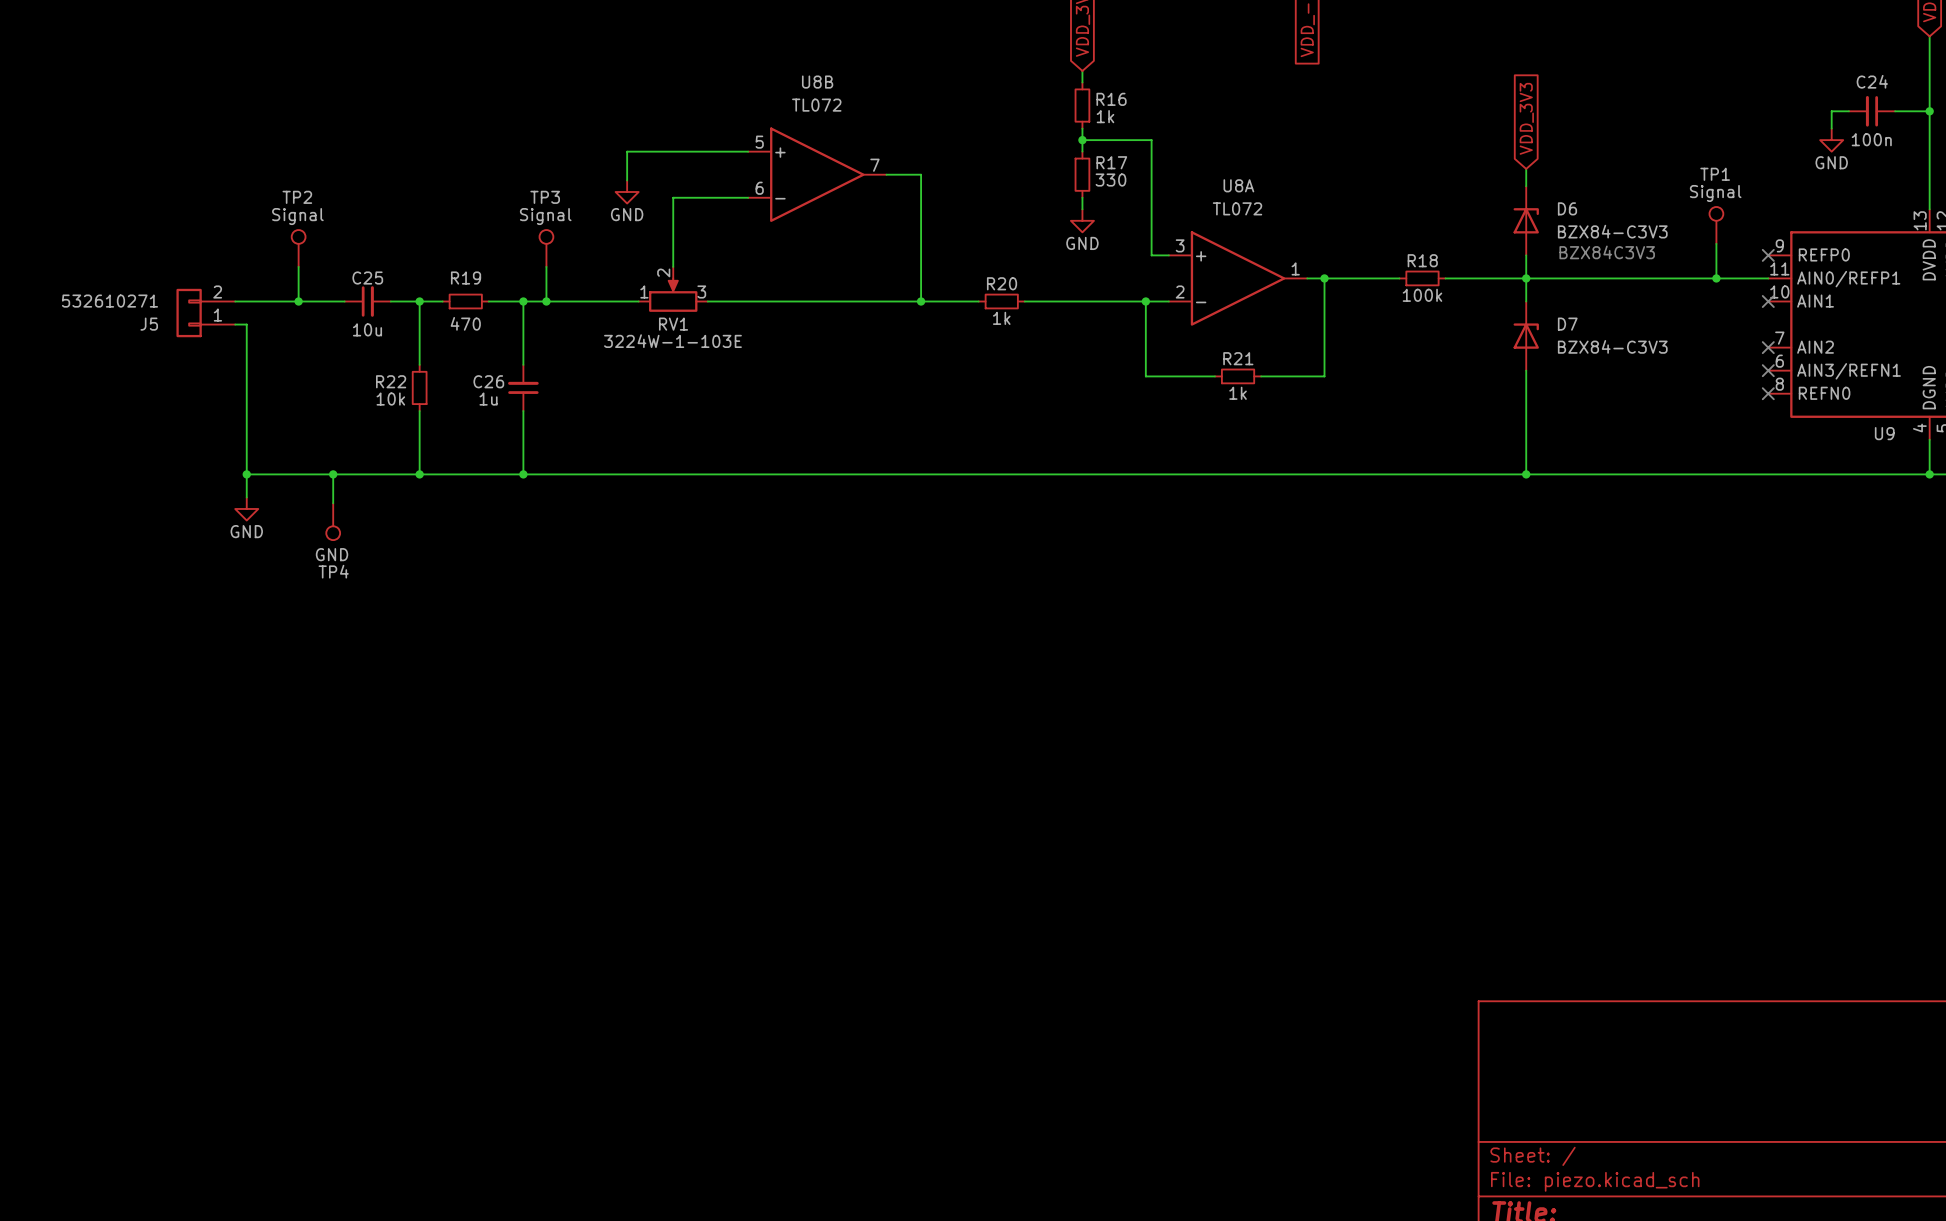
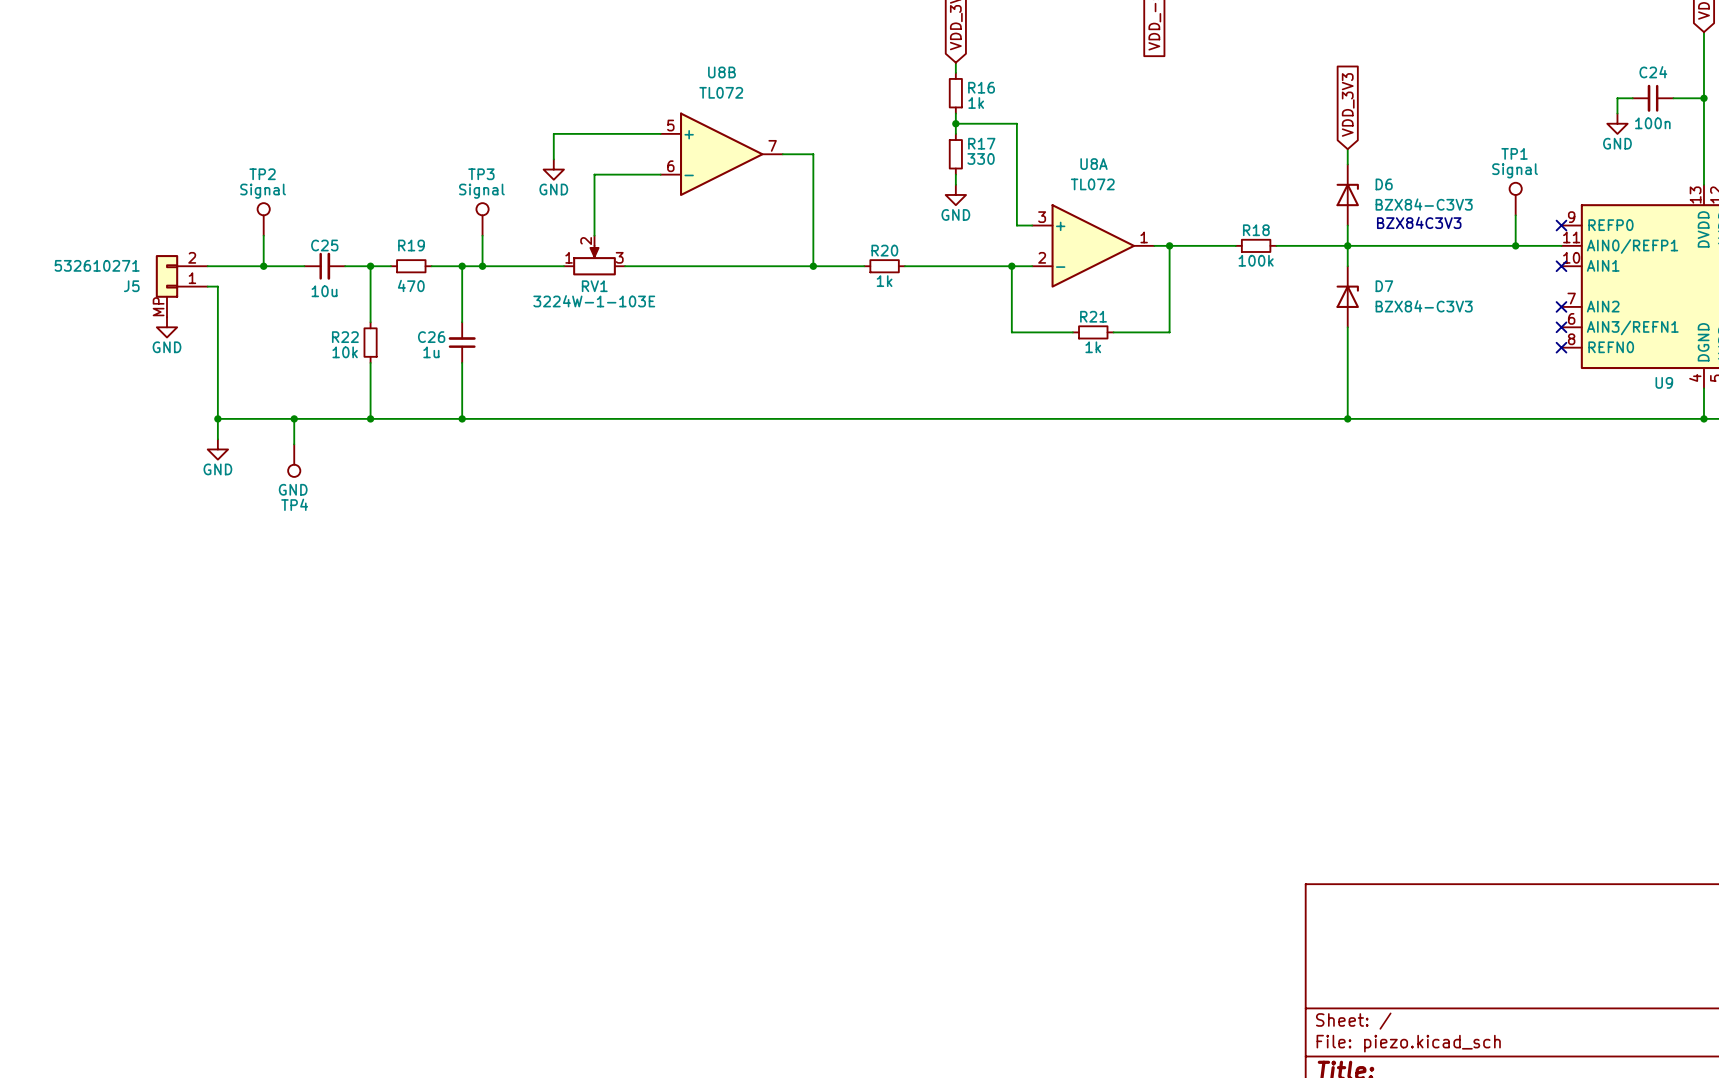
J5 symbol: [176, 288, 236, 338] -> [155, 255, 208, 318]
power symbol: none -> GND (167, 327)

